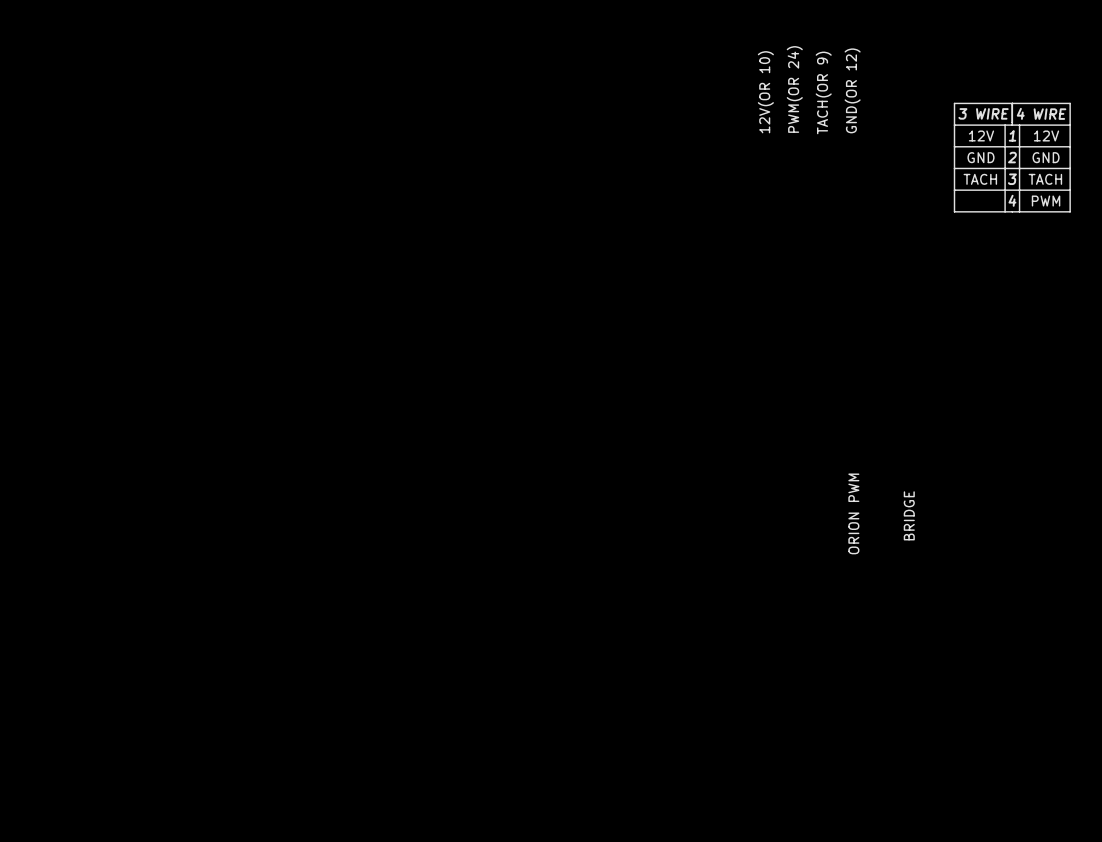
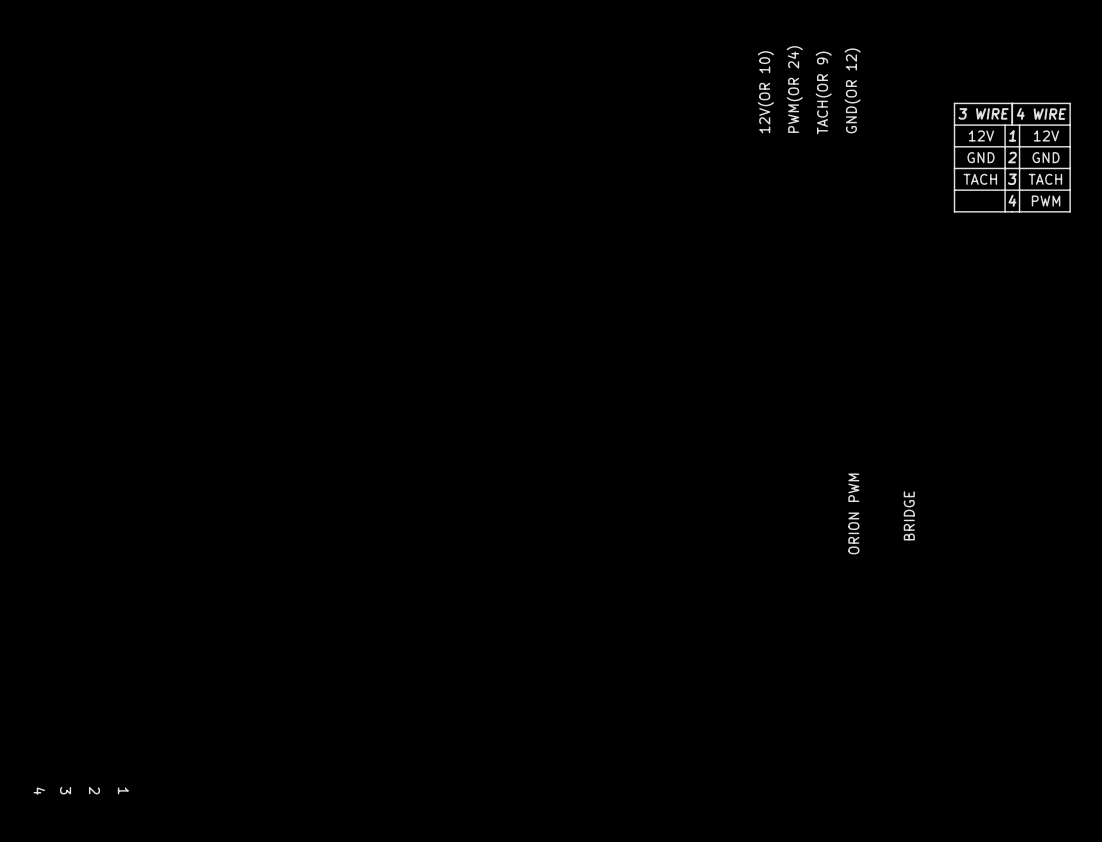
text: none -> 3 (65, 790)
text: none -> 2 (94, 790)
text: none -> 1 (123, 790)
text: none -> 4 (39, 791)

